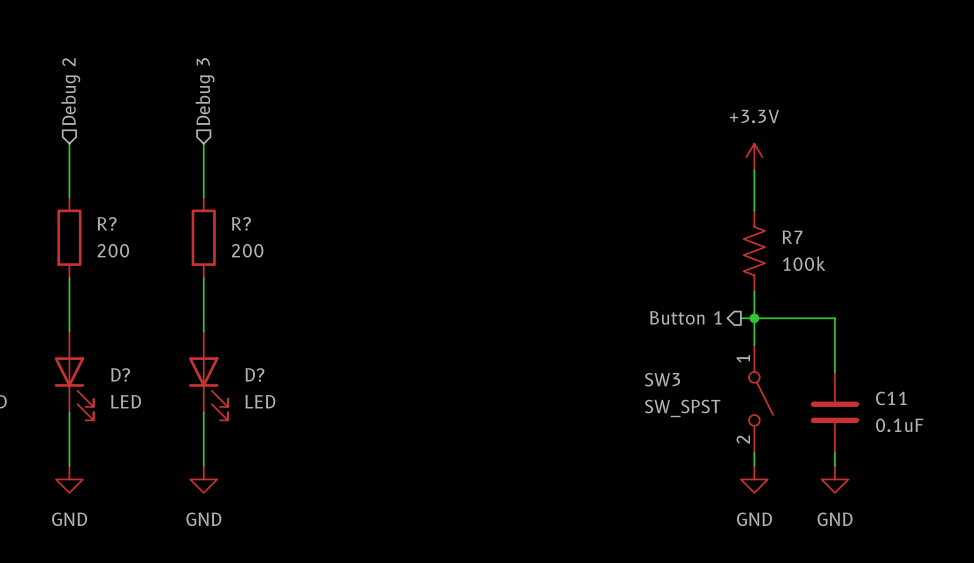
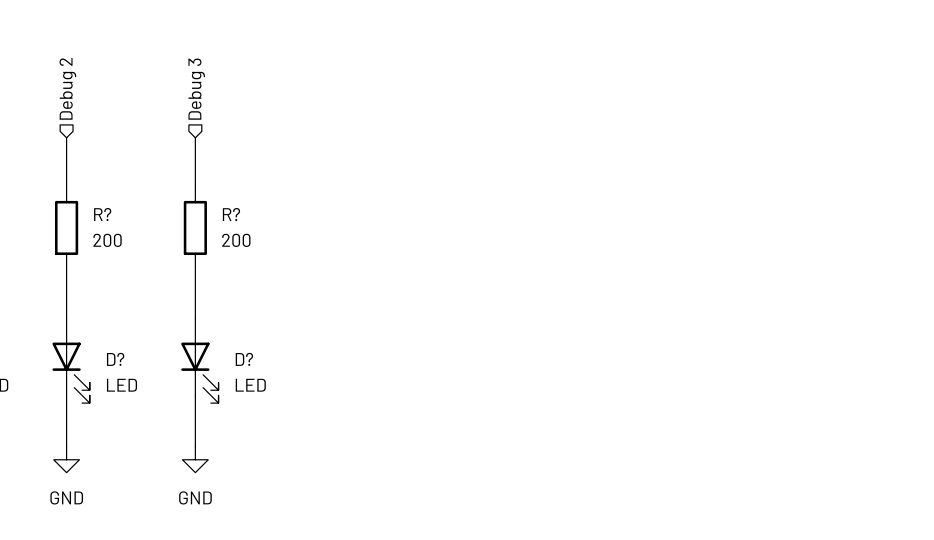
power symbol: +3.3V (754, 157) -> none
wire: (754, 170) (754, 210) -> none
R7: 100k (754, 251) -> none
wire: (754, 291) (754, 345) -> none
hierarchical label: Button 1 (685, 317) -> none
wire: (740, 318) (834, 318) (834, 372) -> none
junction: (754, 318) -> none
SW3: SW_SPST (761, 398) -> none
C11: 0.1uF (834, 412) -> none
wire: (754, 452) (754, 466) -> none
wire: (834, 452) (834, 466) -> none
power symbol: GND (754, 479) -> none
power symbol: GND (834, 479) -> none

